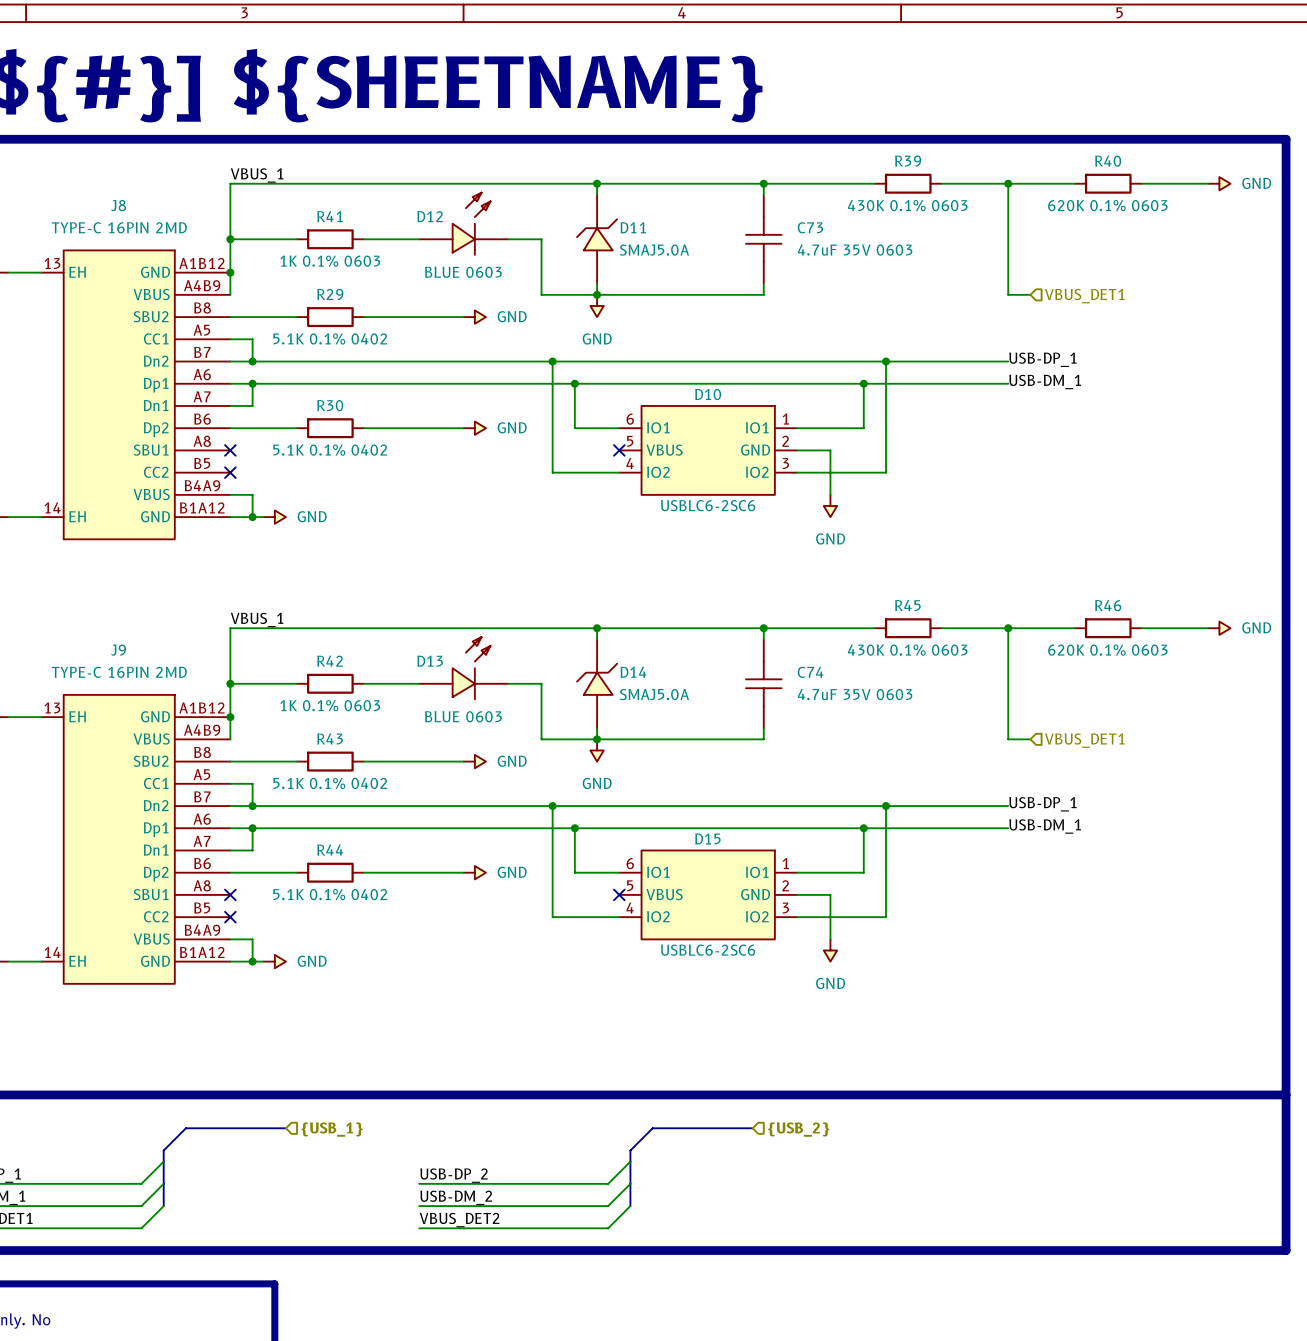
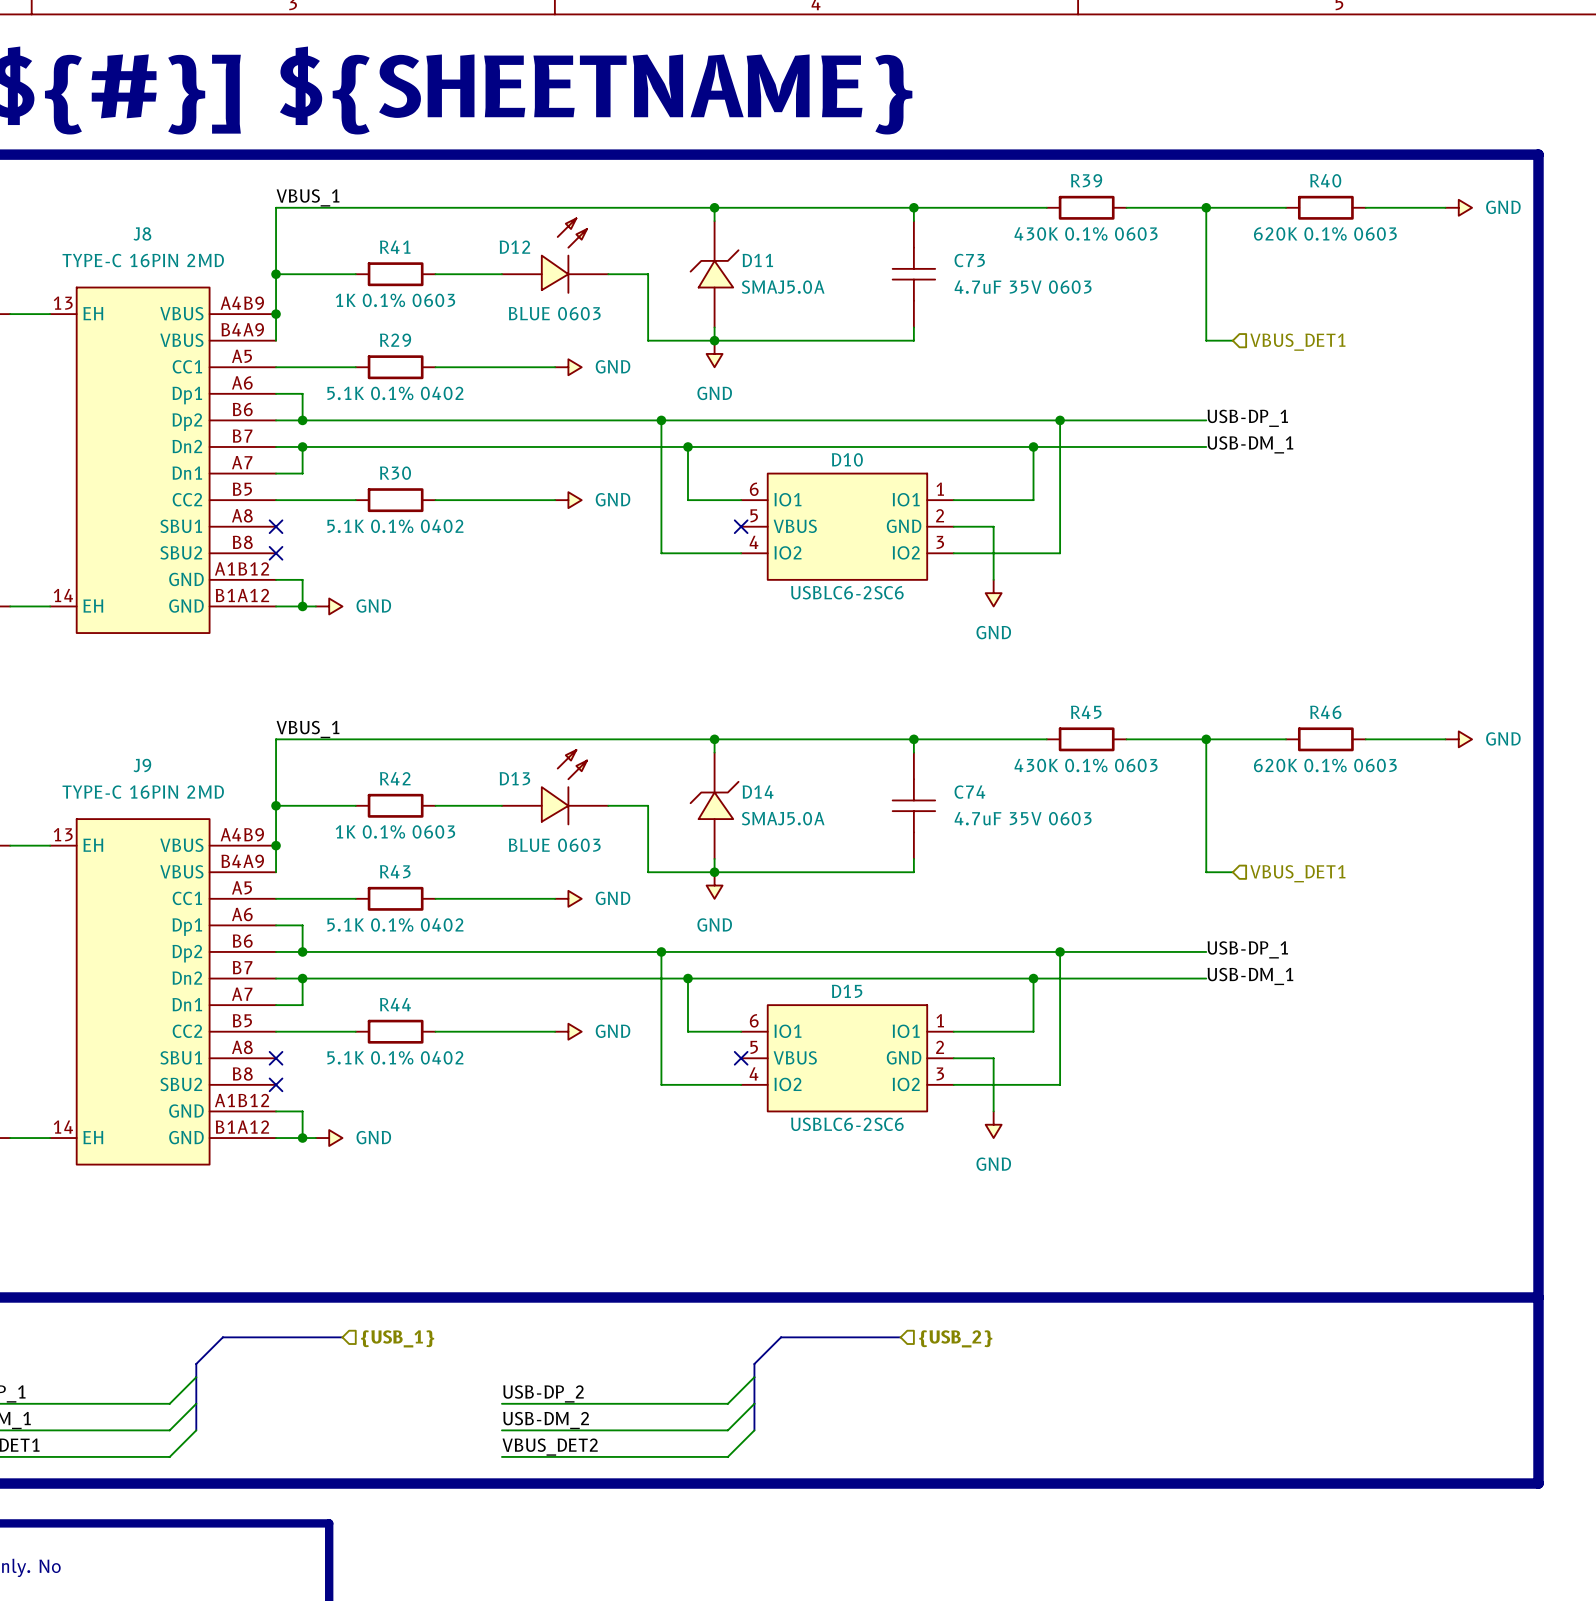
J8 symbol: [41, 250, 231, 540] -> [50, 287, 277, 634]
J9 symbol: [41, 694, 231, 984] -> [50, 819, 277, 1165]

